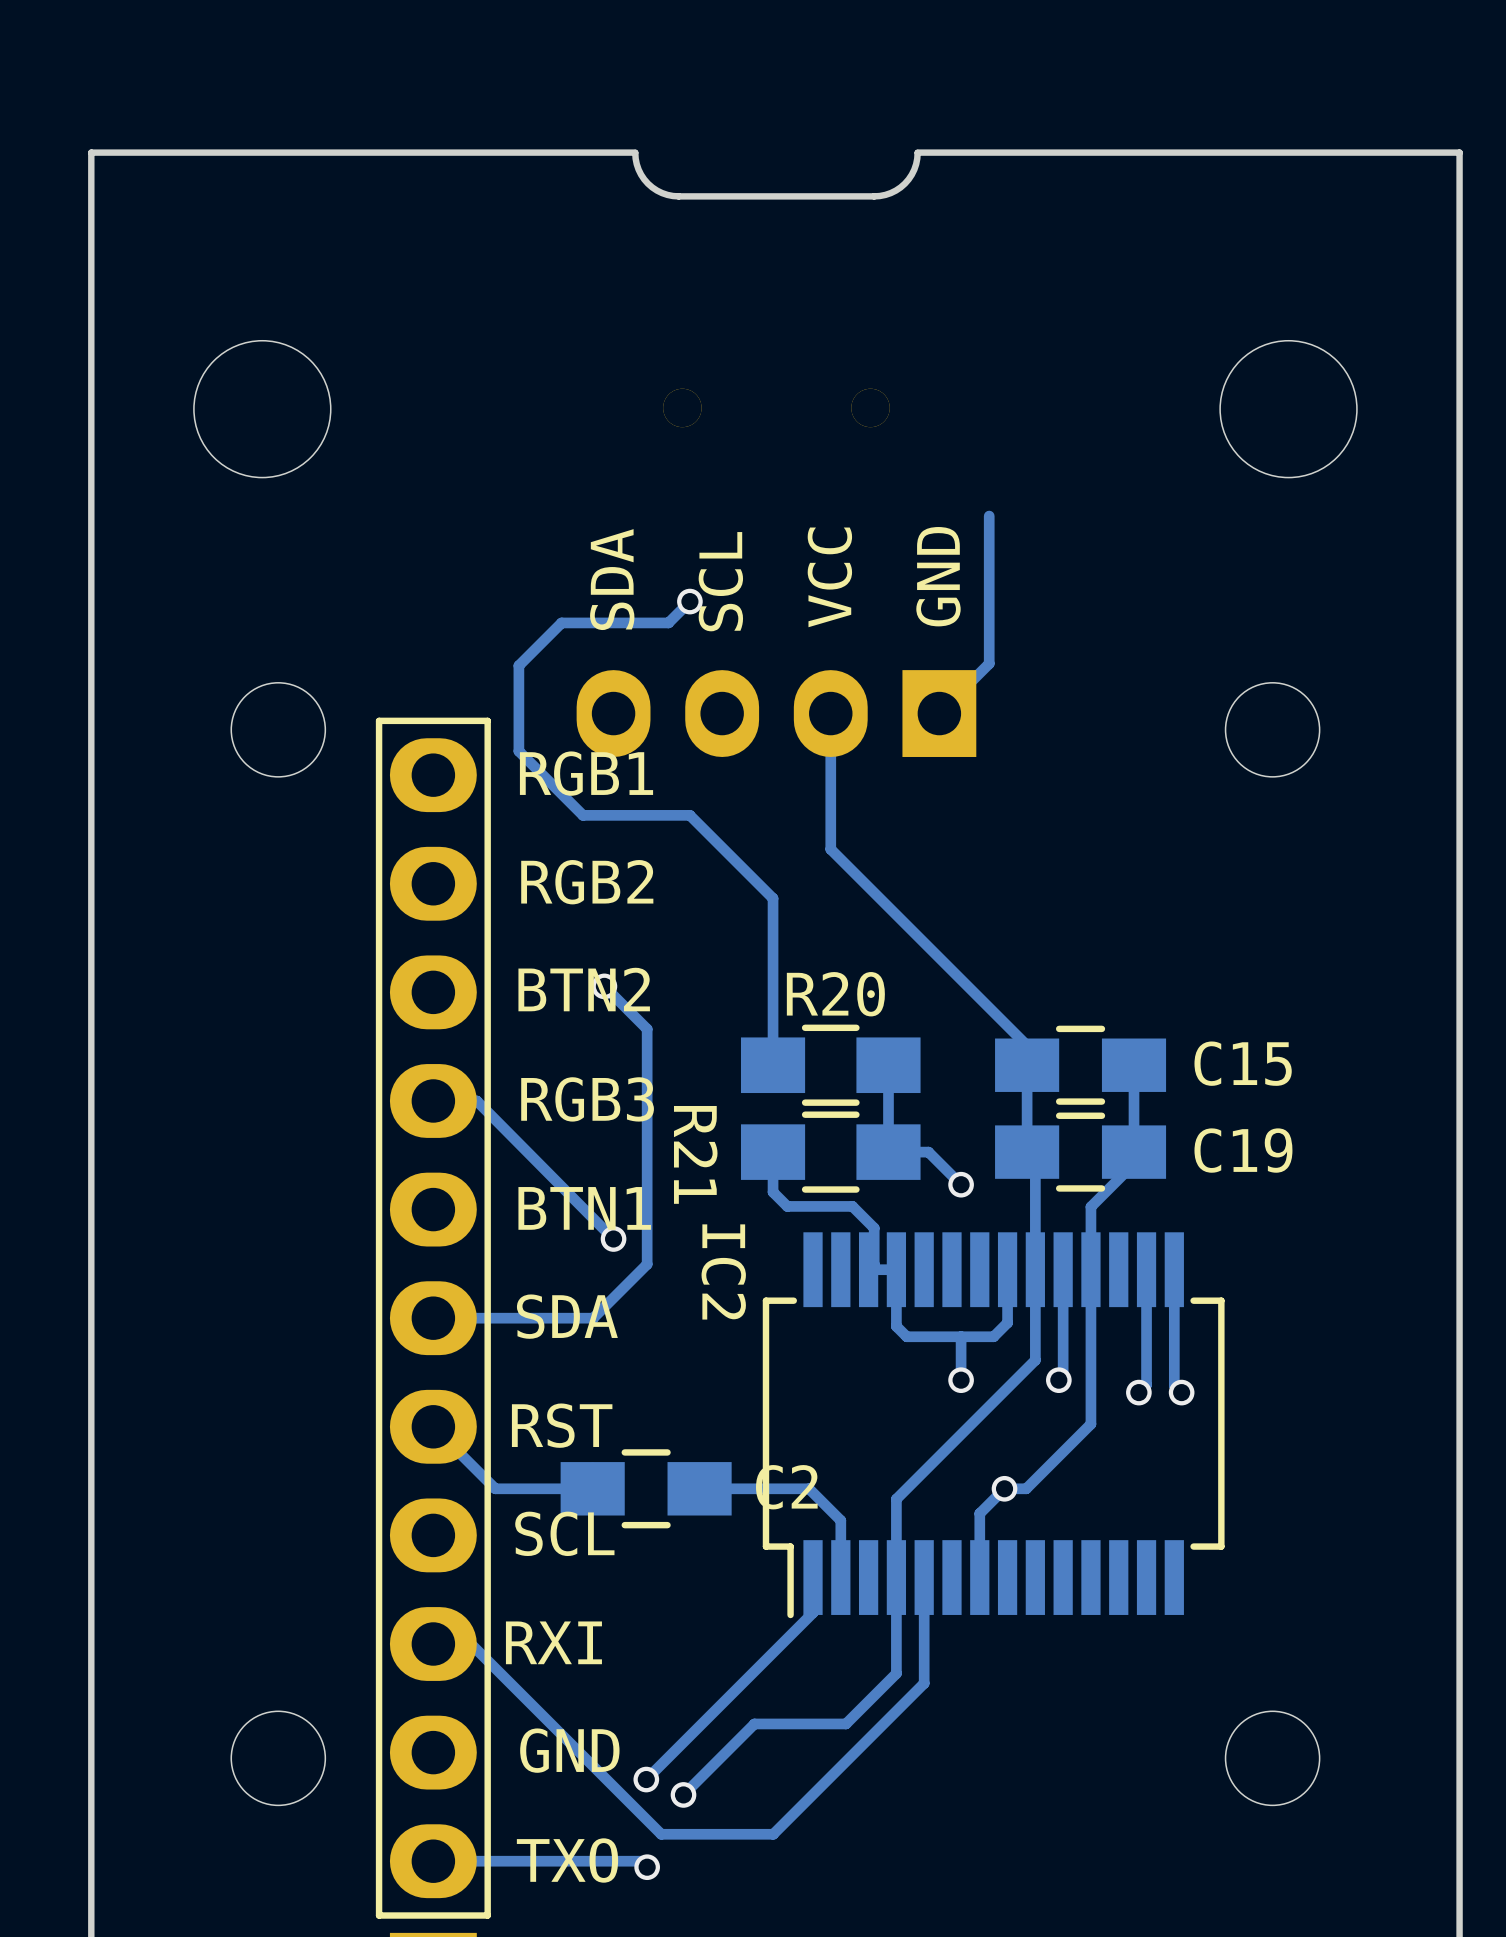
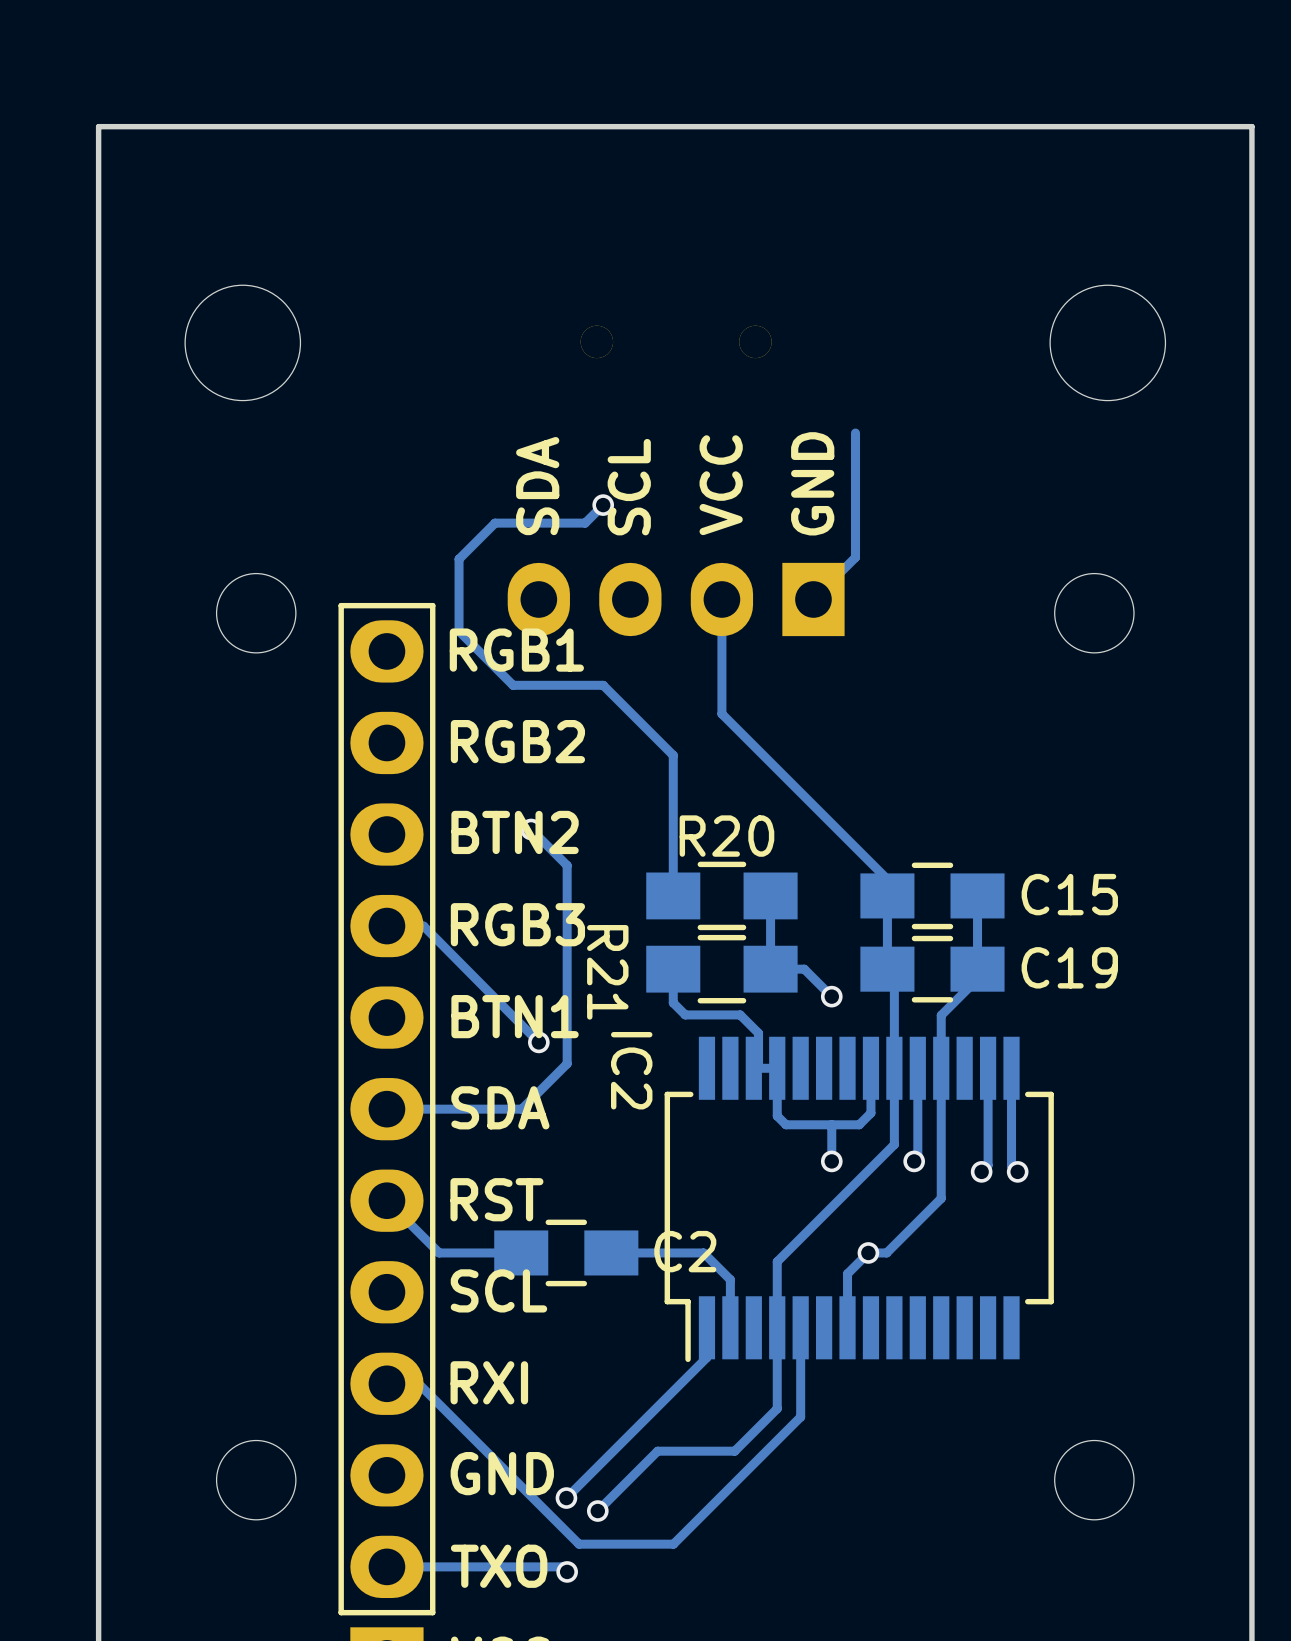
board edge: (917, 152) (914, 169) (904, 183) (890, 193) (874, 196) (673, 196) (656, 190) (644, 179) (636, 164) (635, 152) -> (795, 126) (557, 126)

